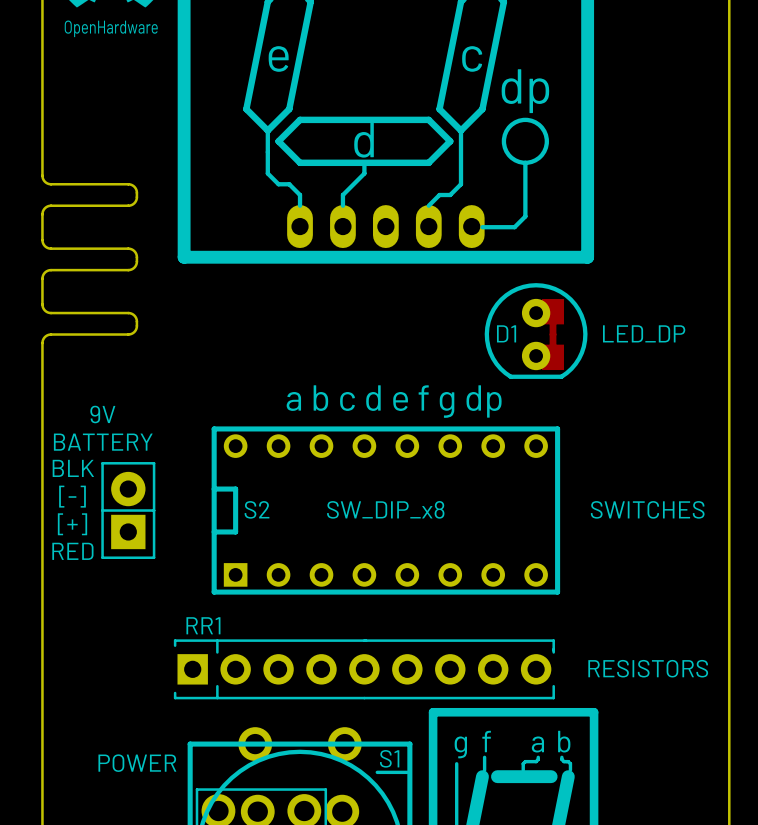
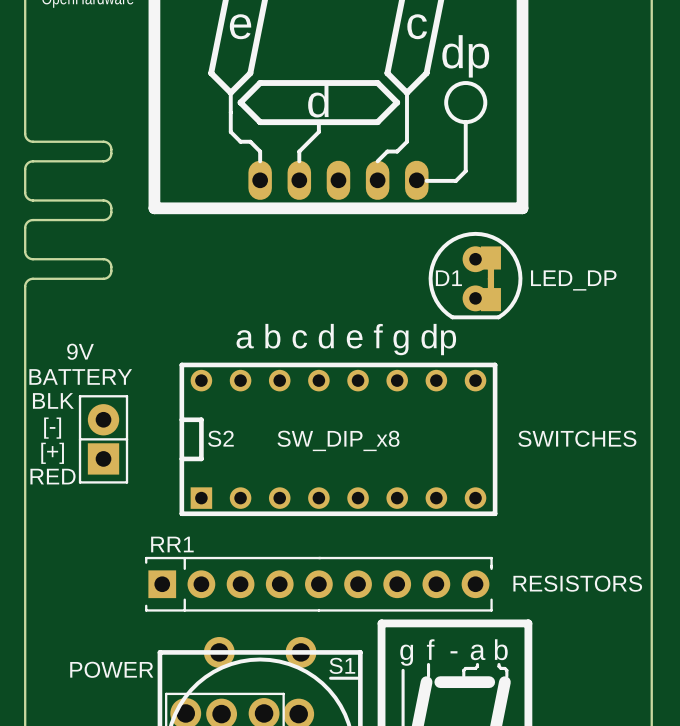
text: none -> - (453, 652)

